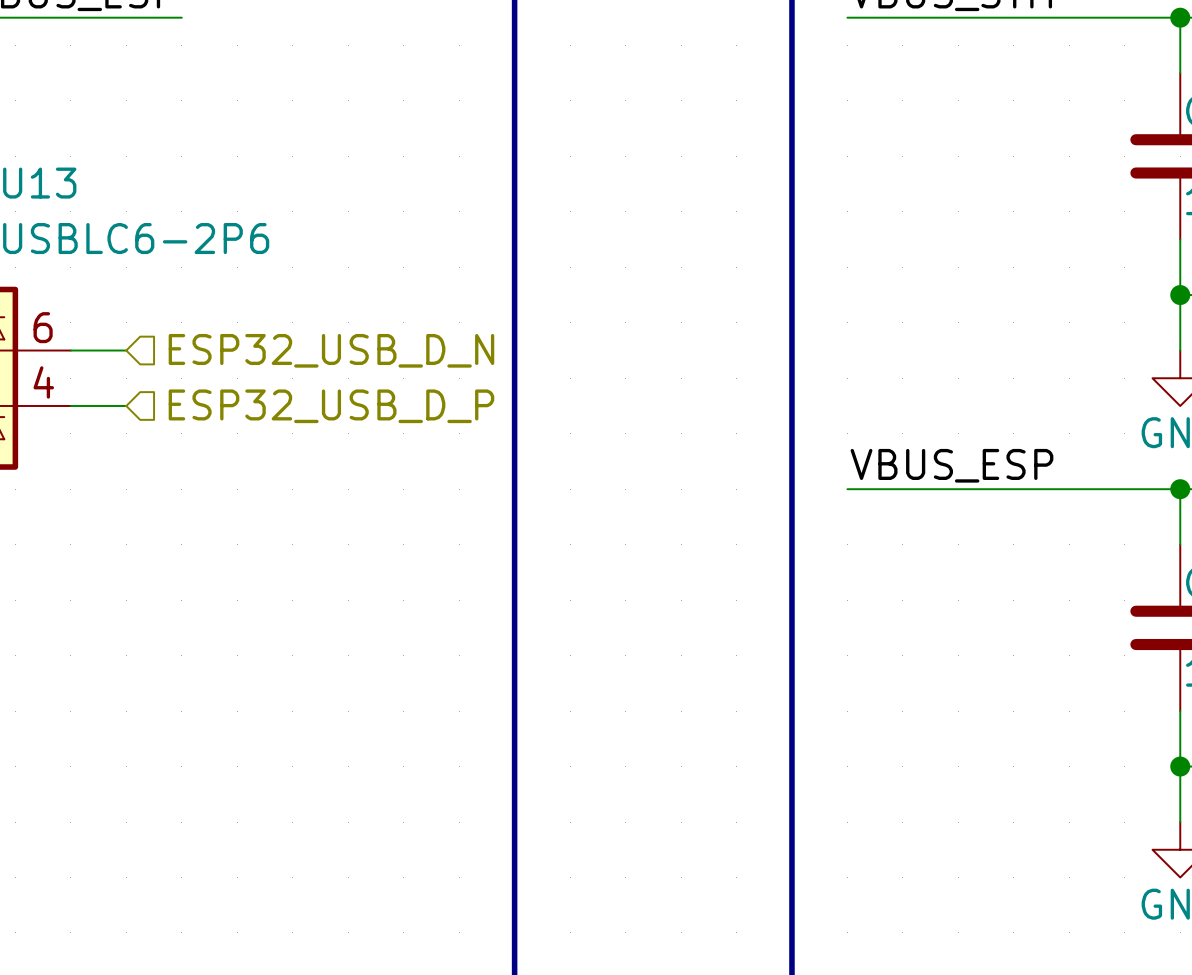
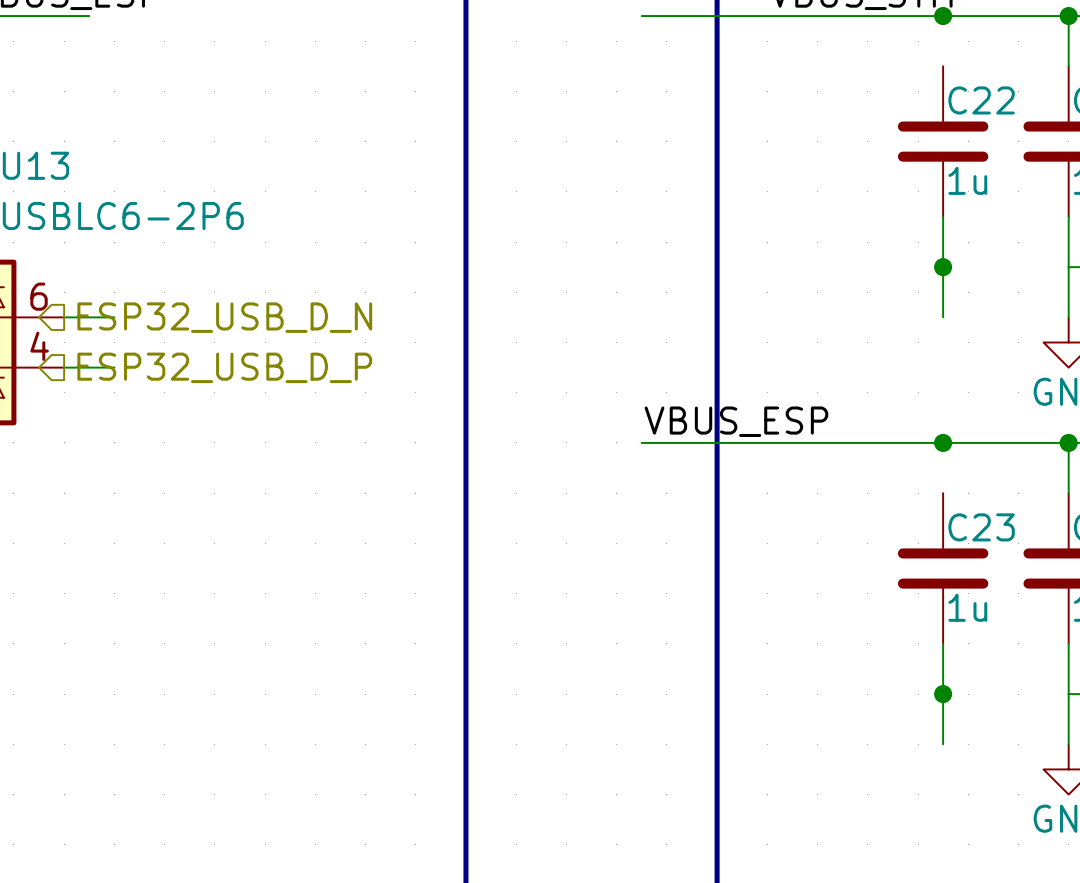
wire: (98, 17) (181, 17) -> none
wire: none -> (641, 16) (767, 16)
junction: none -> (943, 16)
C22: none -> 1u (943, 141)
wire: none -> (943, 216) (943, 317)
junction: none -> (943, 267)
junction: (1180, 295) -> none
hierarchical label position: ESP32_USB_D_N (331, 350) -> ESP32_USB_D_N (224, 317)
hierarchical label position: ESP32_USB_D_P (331, 406) -> ESP32_USB_D_P (224, 367)
label position: VBUS_ESP (951, 465) -> VBUS_ESP (736, 421)
wire: none -> (641, 442) (767, 442)
junction: none -> (943, 442)
C23: none -> 1u (943, 568)
wire: none -> (943, 643) (943, 744)
junction: none -> (943, 694)
junction: (1180, 766) -> none

